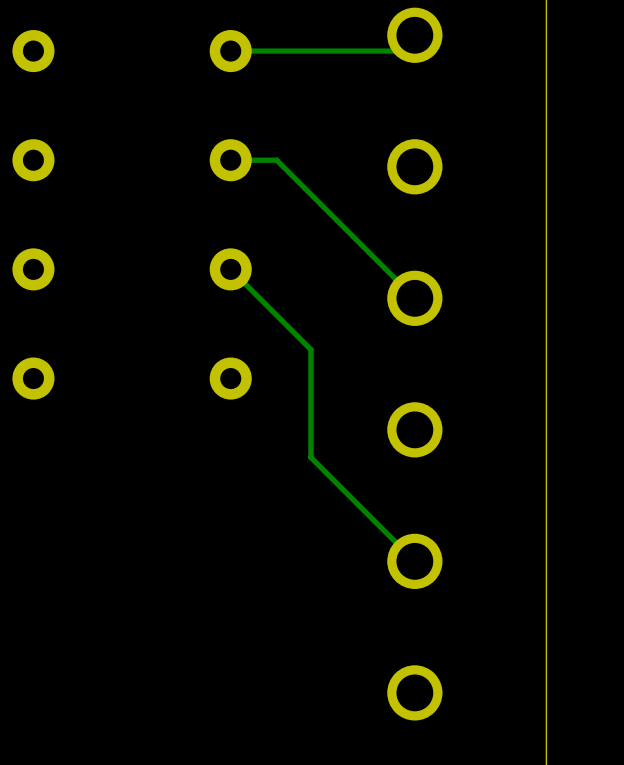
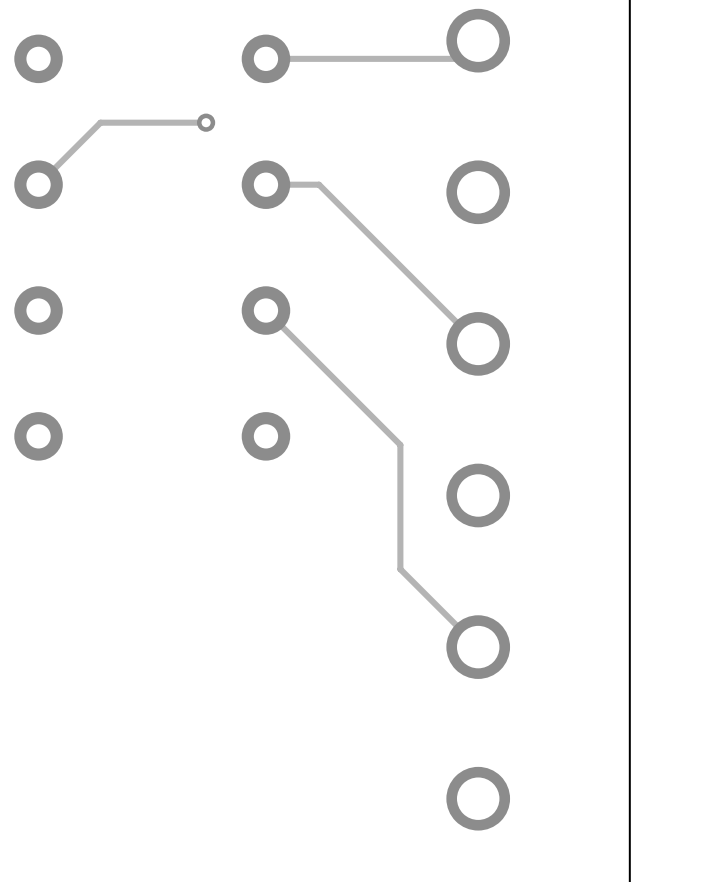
track: none -> (206, 122) (100, 122) (38, 184)
via: none -> (206, 122)
track: (310, 349) (310, 457) (347, 493) -> (358, 403) (400, 444) (400, 569)

